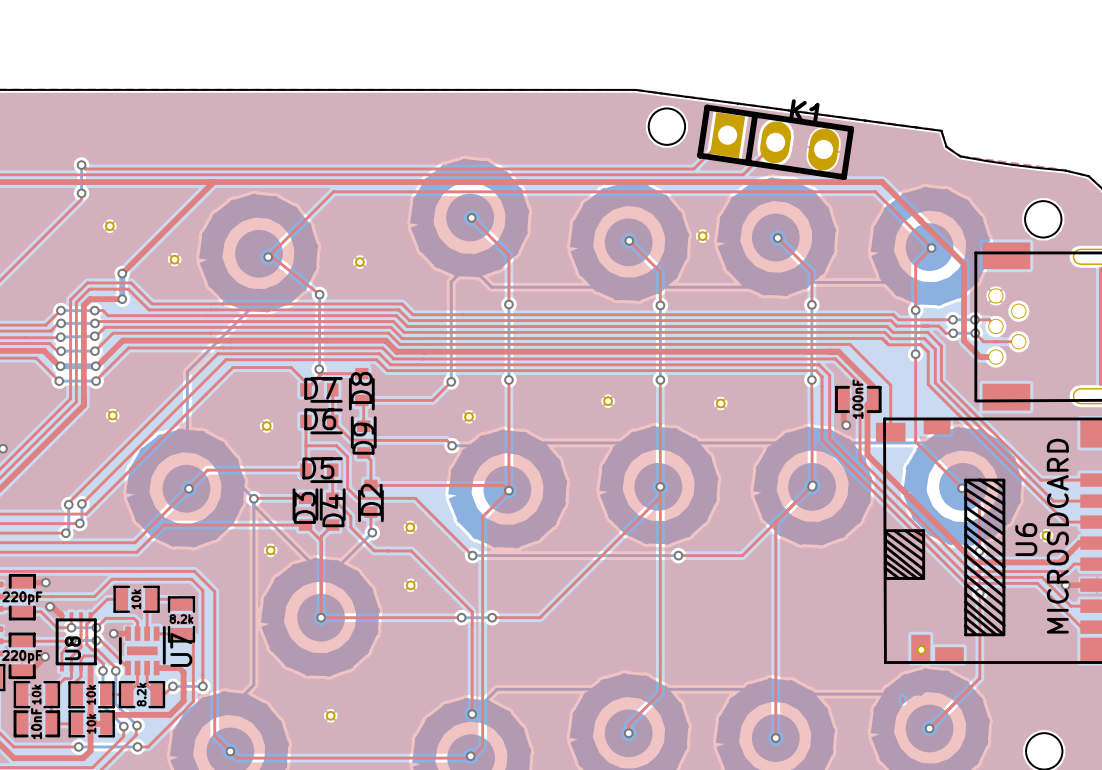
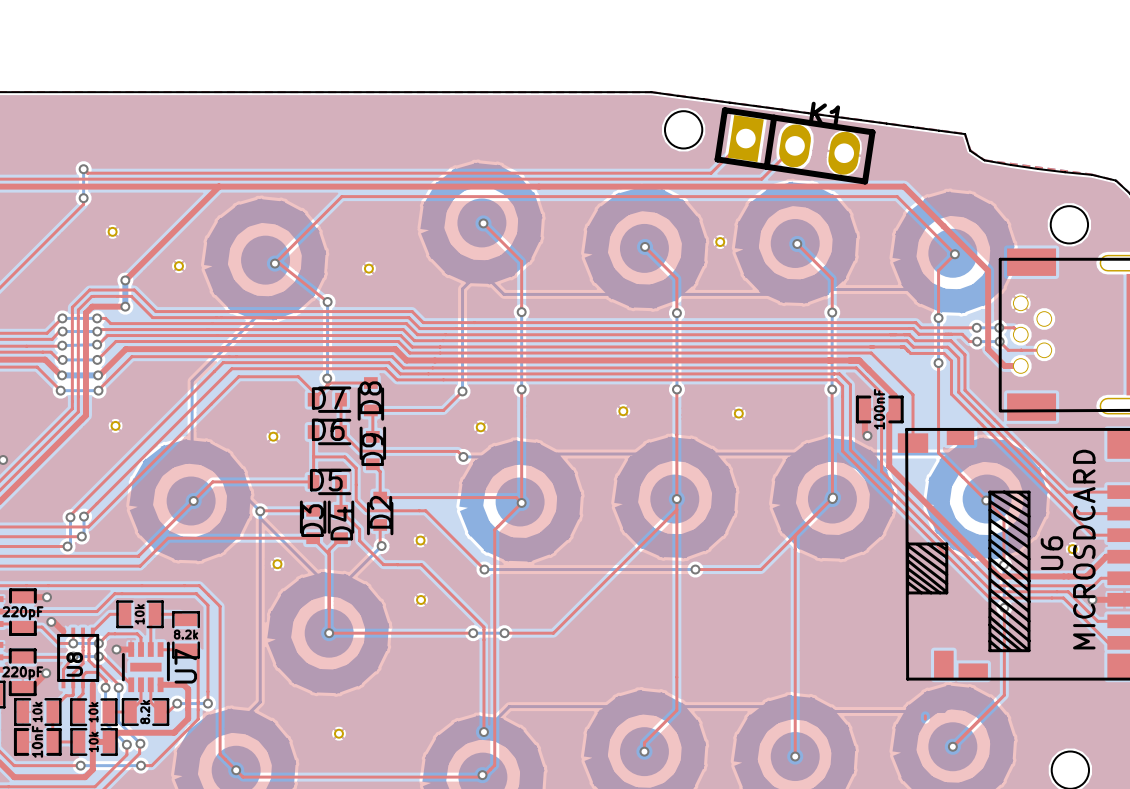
part: (921, 649) -> none

